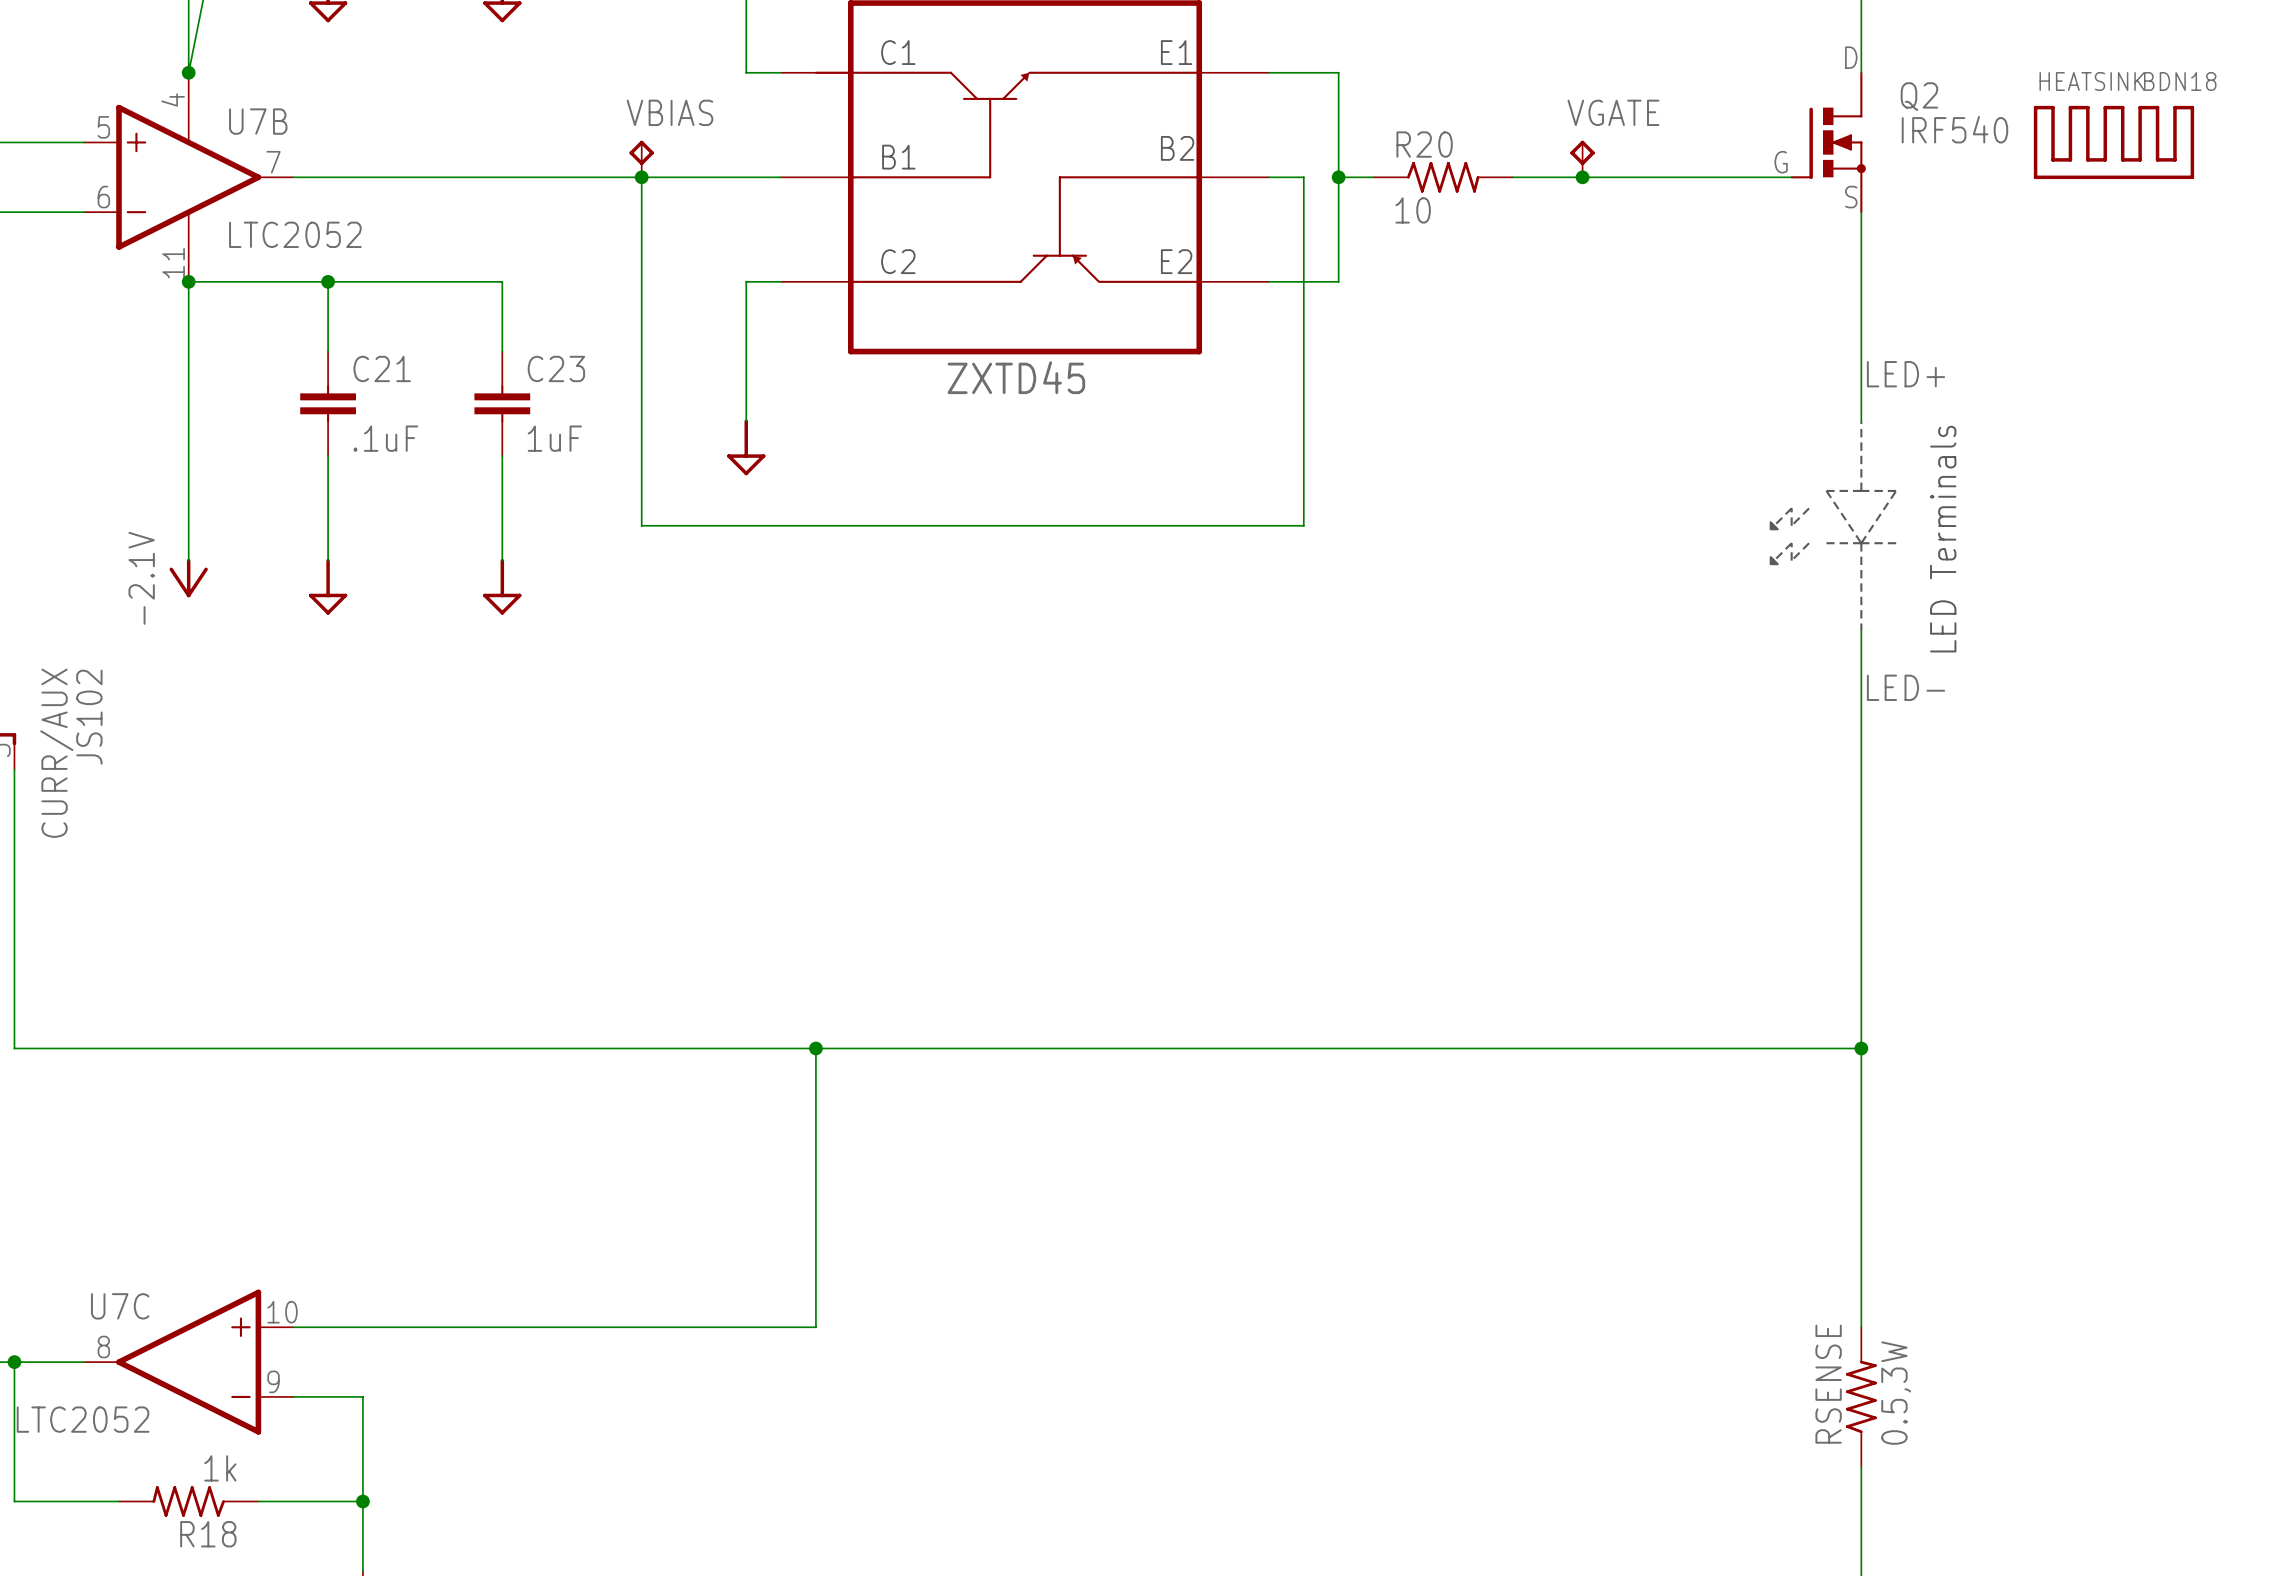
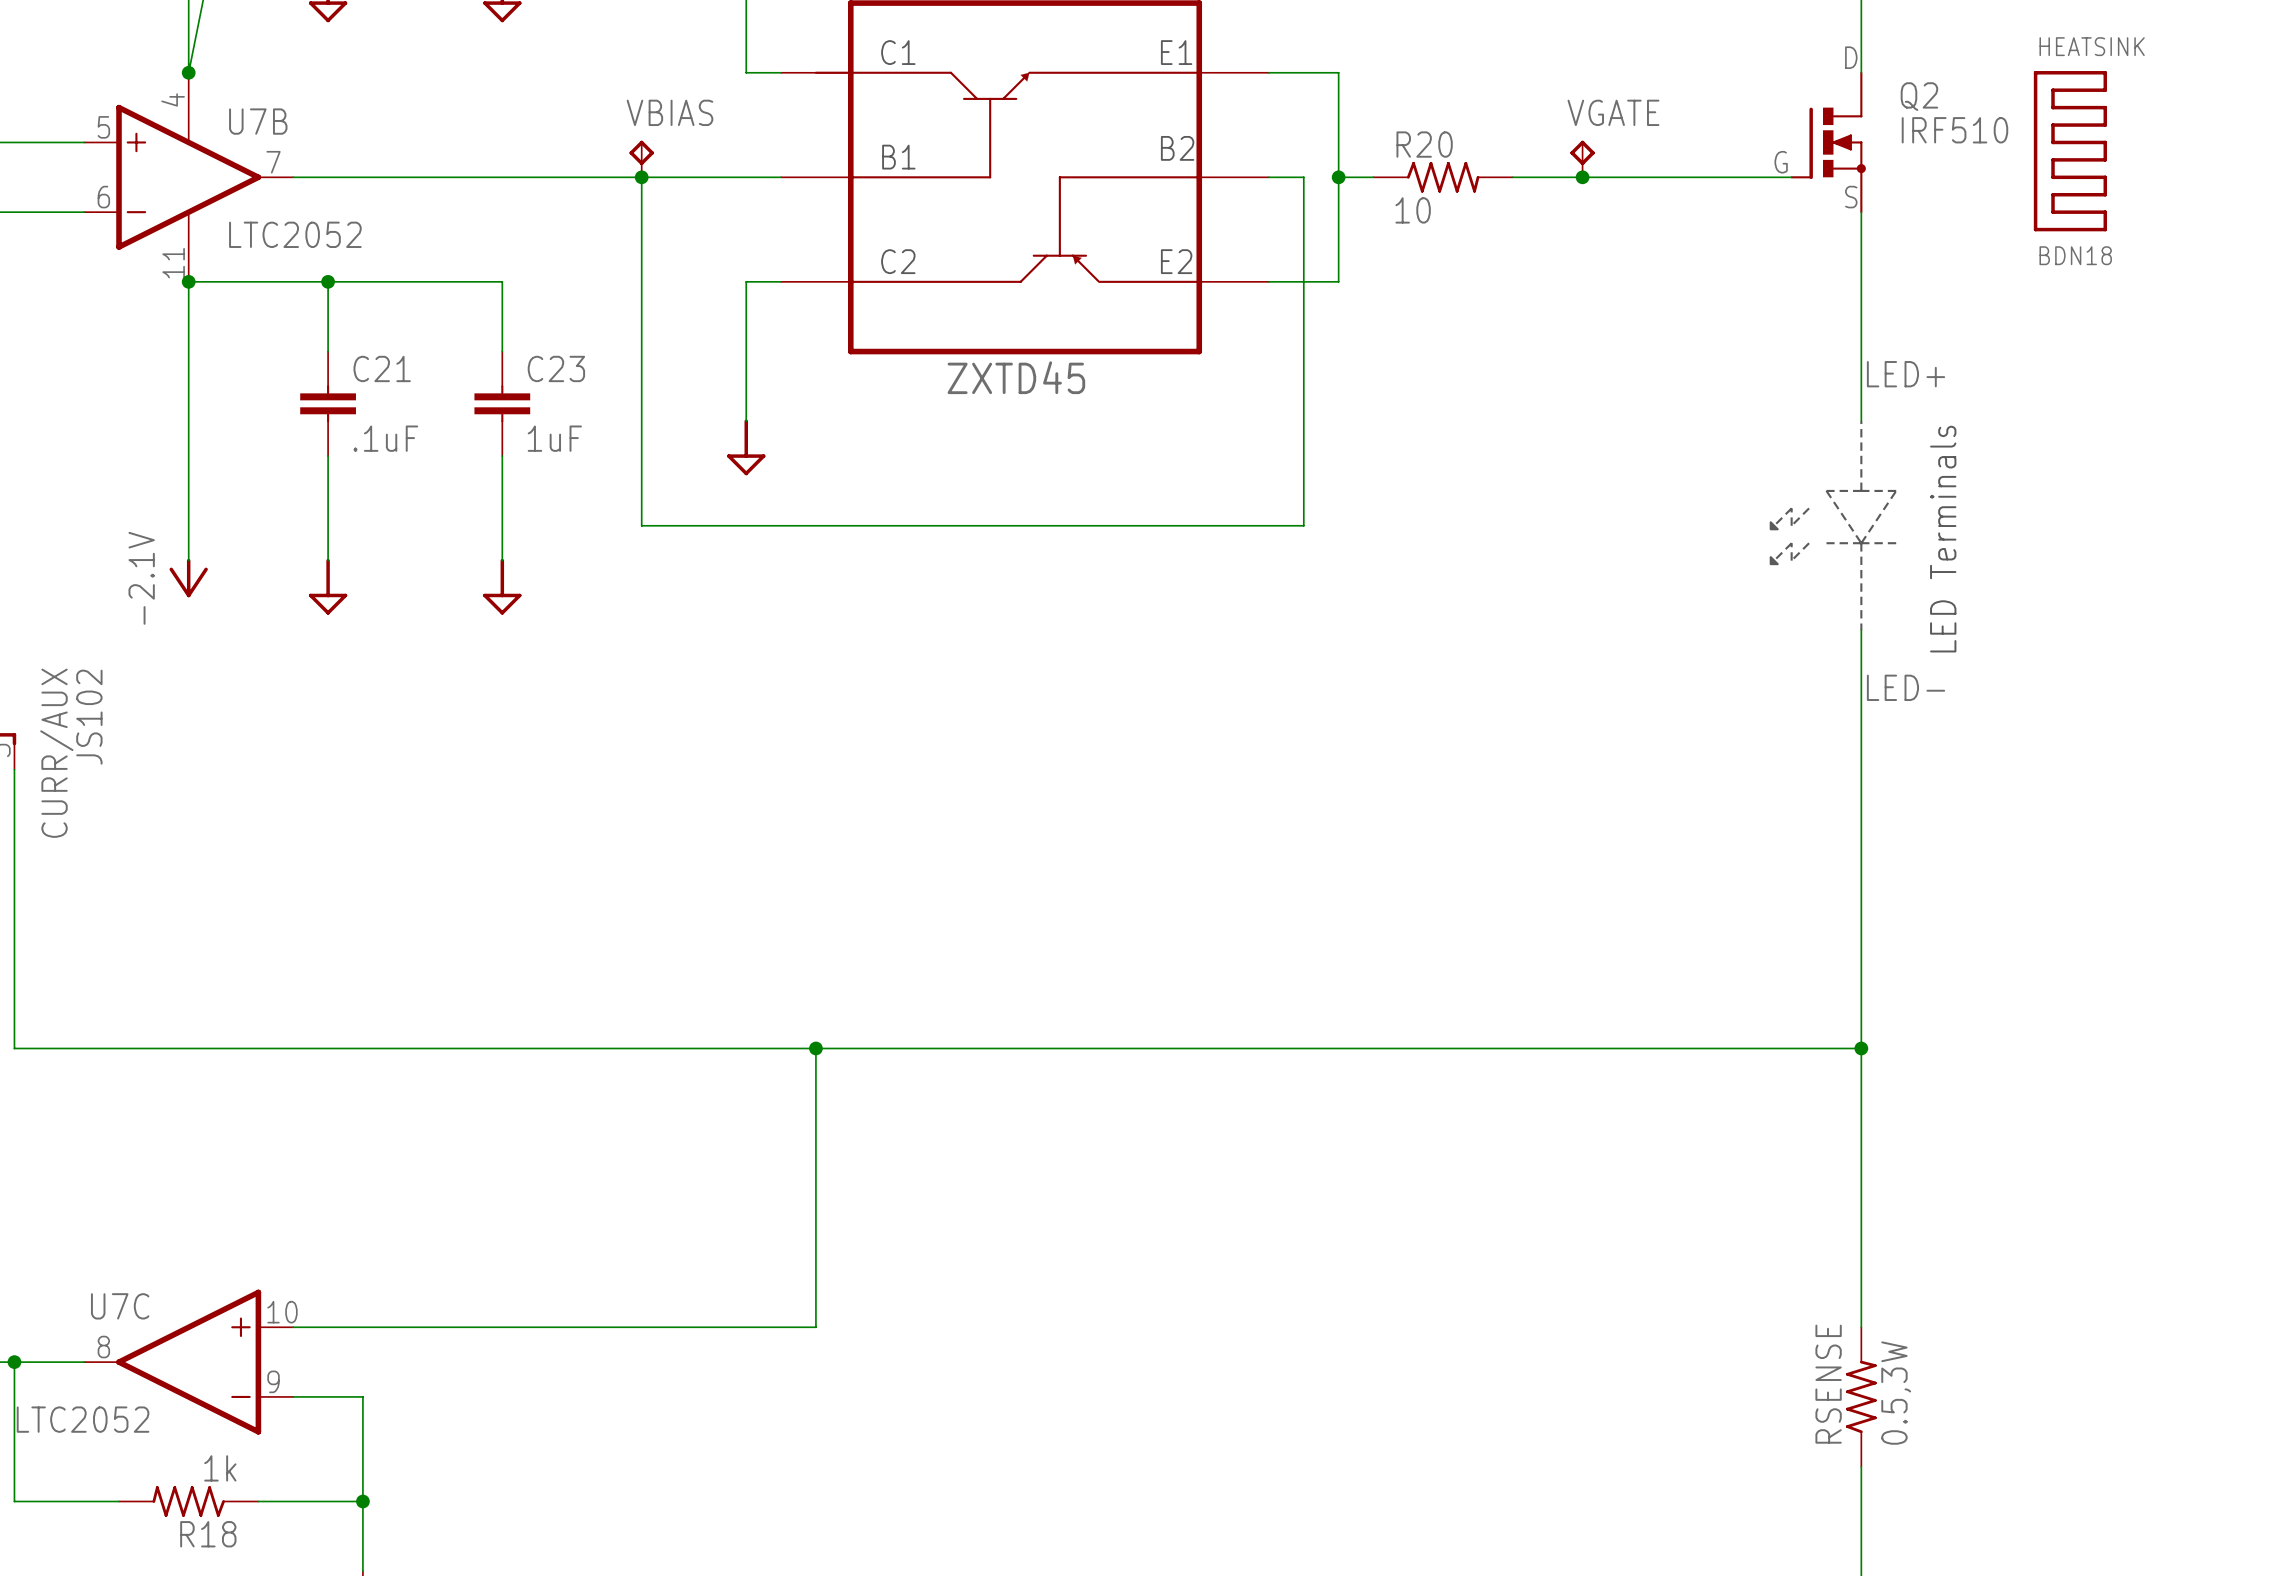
HEATSINK name position: HEATSINK (2092, 81) -> HEATSINK (2092, 46)
HEATSINK value position: BDN18 (2180, 81) -> BDN18 (2075, 255)
Q2 value: IRF540 (1954, 129) -> IRF510 (1954, 130)
HEATSINK rotation: 0° (2113, 142) -> 90° clockwise (2070, 151)

